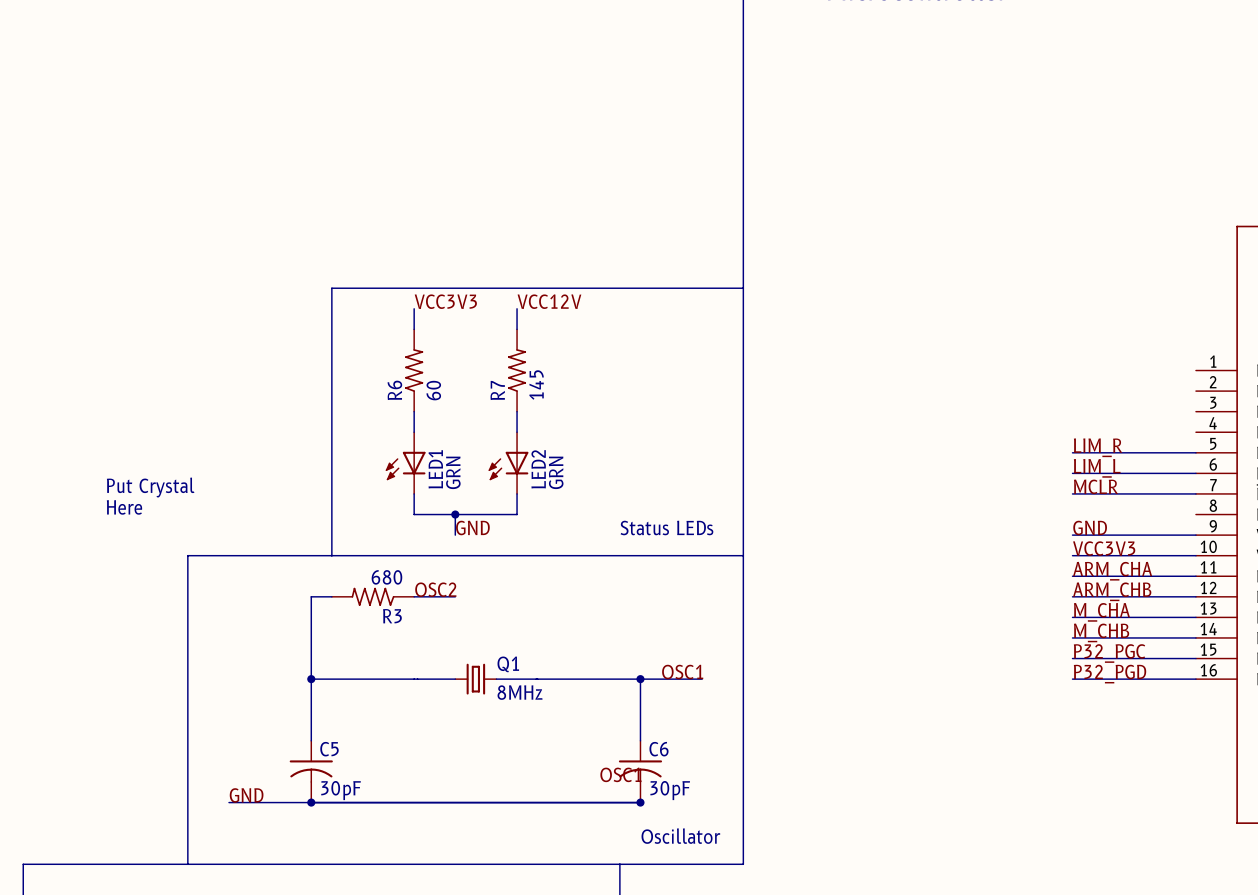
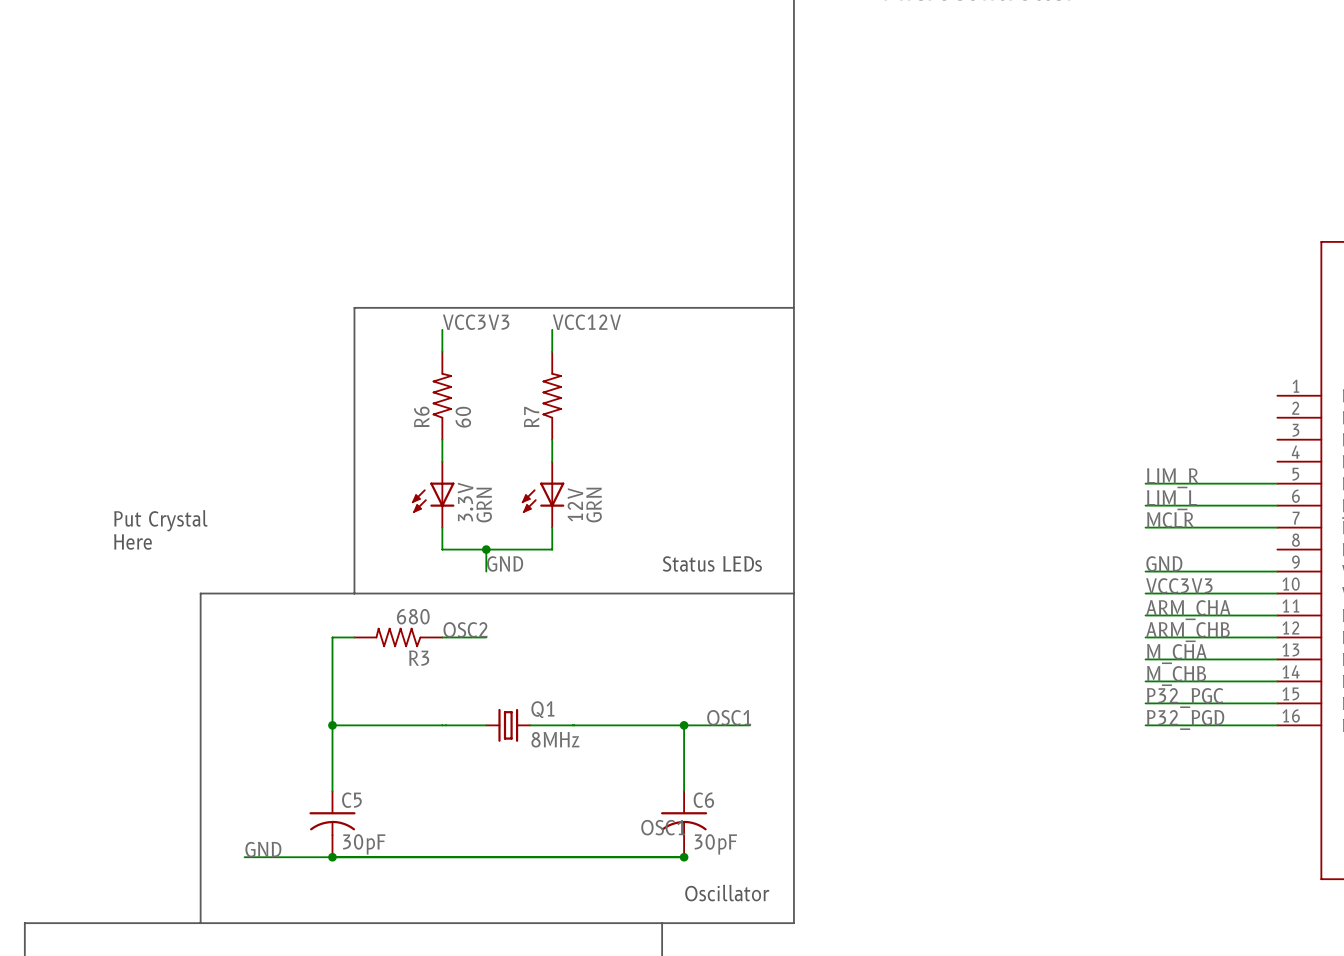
R7 value: 145 (536, 384) -> none
LED1 name: LED1 (435, 469) -> 3.3V (465, 502)
LED2 name: LED2 (538, 469) -> 12V (575, 504)

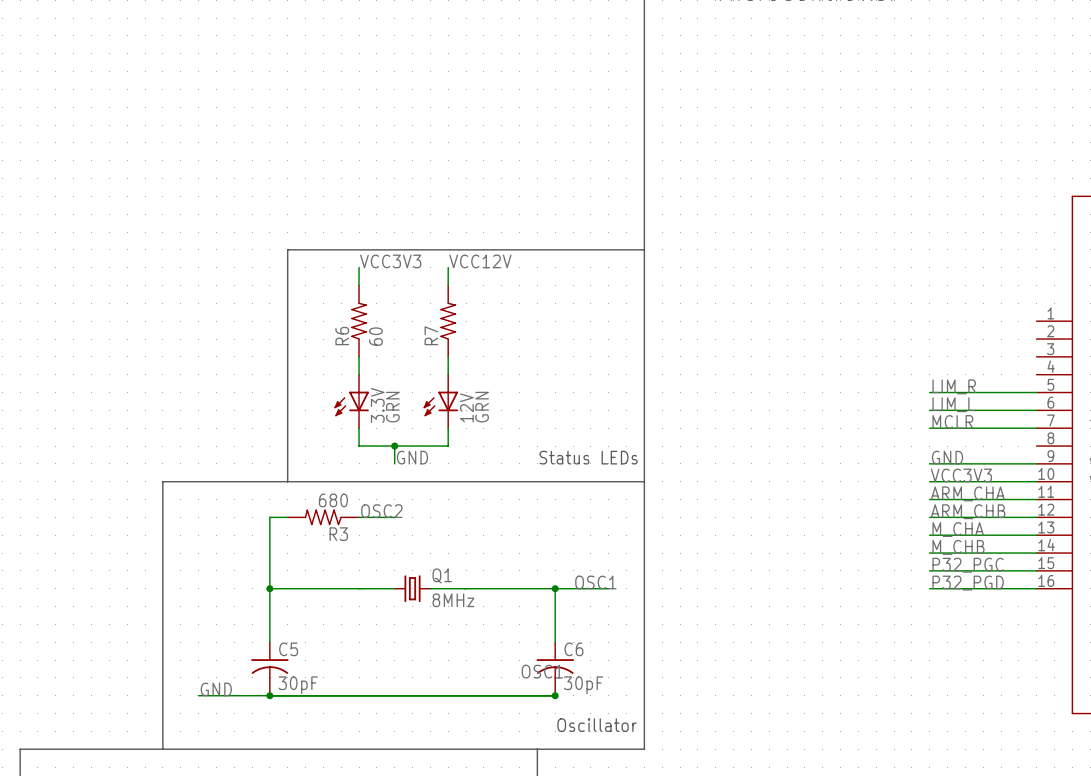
text: Put Crystal (160, 520) -> none
text: Here (132, 541) -> none

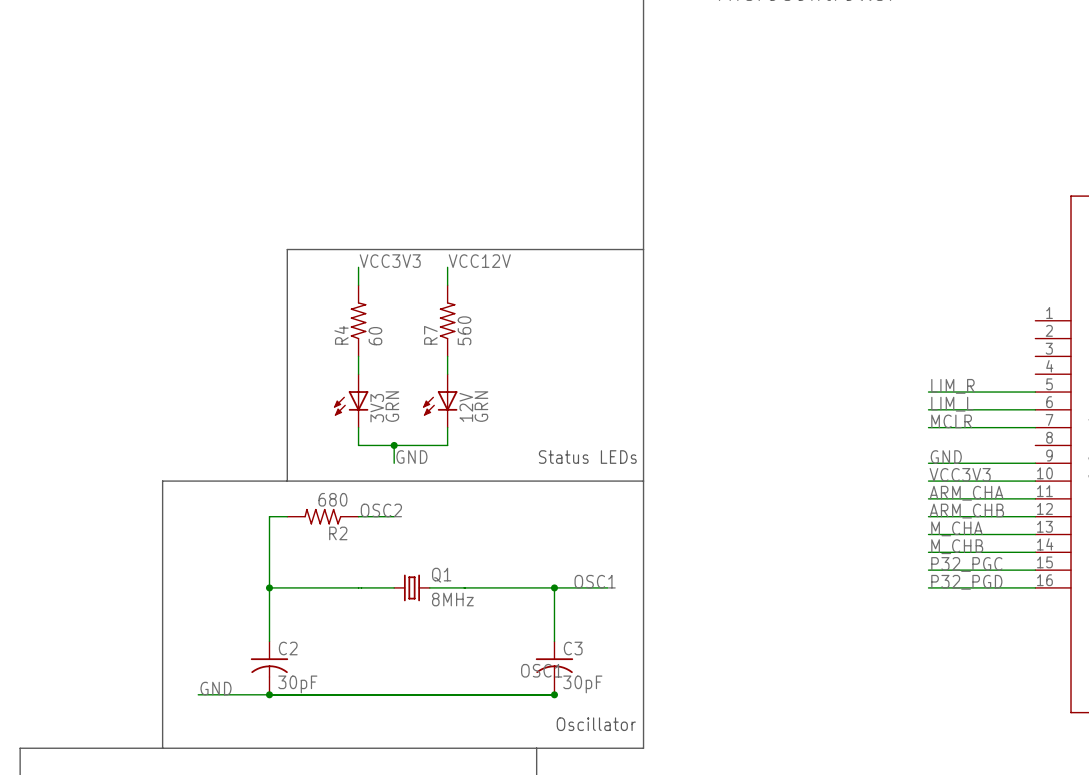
R7 value: none -> 560 (464, 330)
R6 name: R6 (342, 336) -> R4 (341, 335)
3.3V name: 3.3V (377, 405) -> 3V3 (377, 408)
R3 name: R3 (338, 534) -> R2 (338, 533)
C5 name: C5 (288, 649) -> C2 (288, 648)
C6 name: C6 (573, 649) -> C3 (573, 648)

